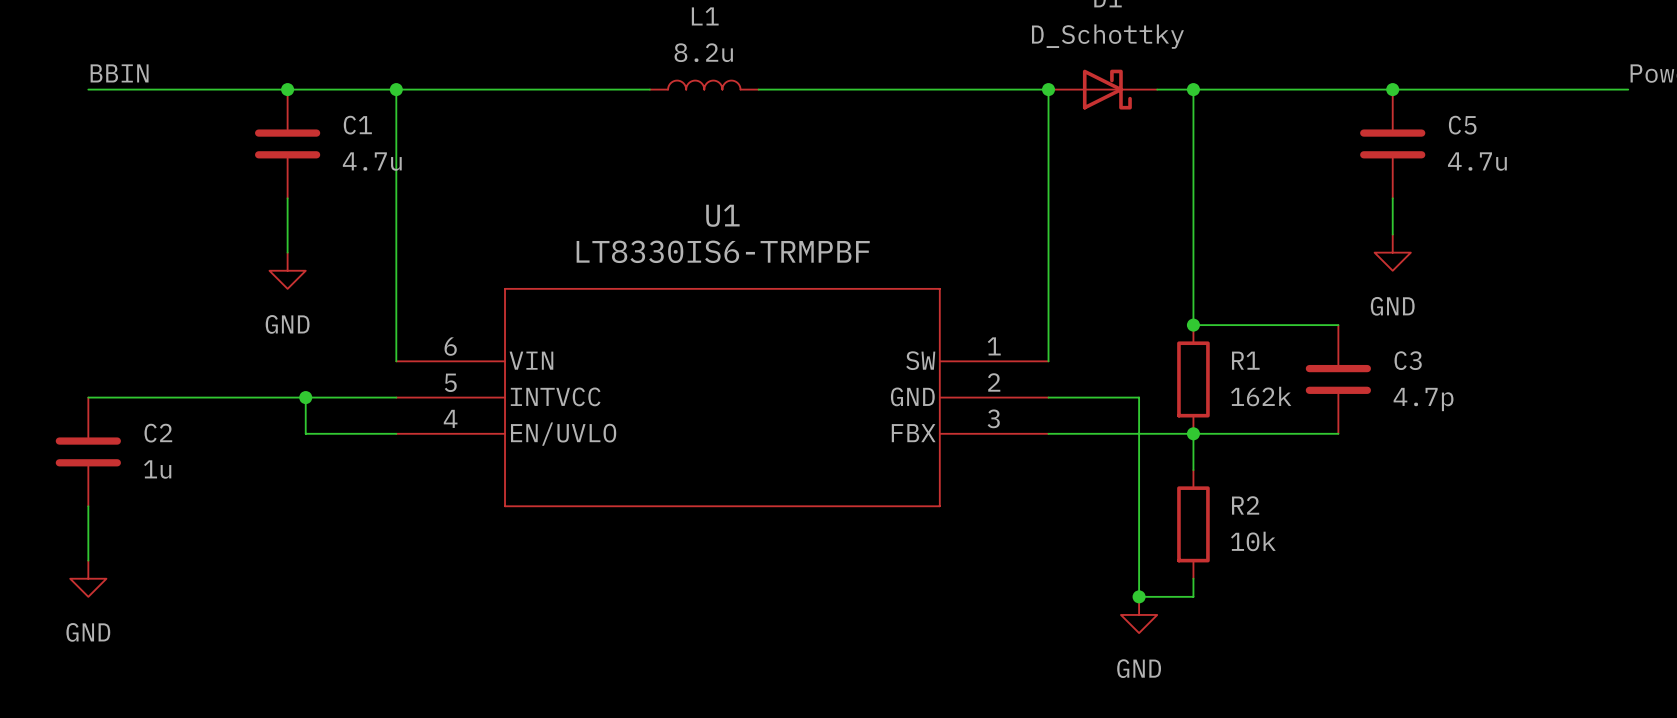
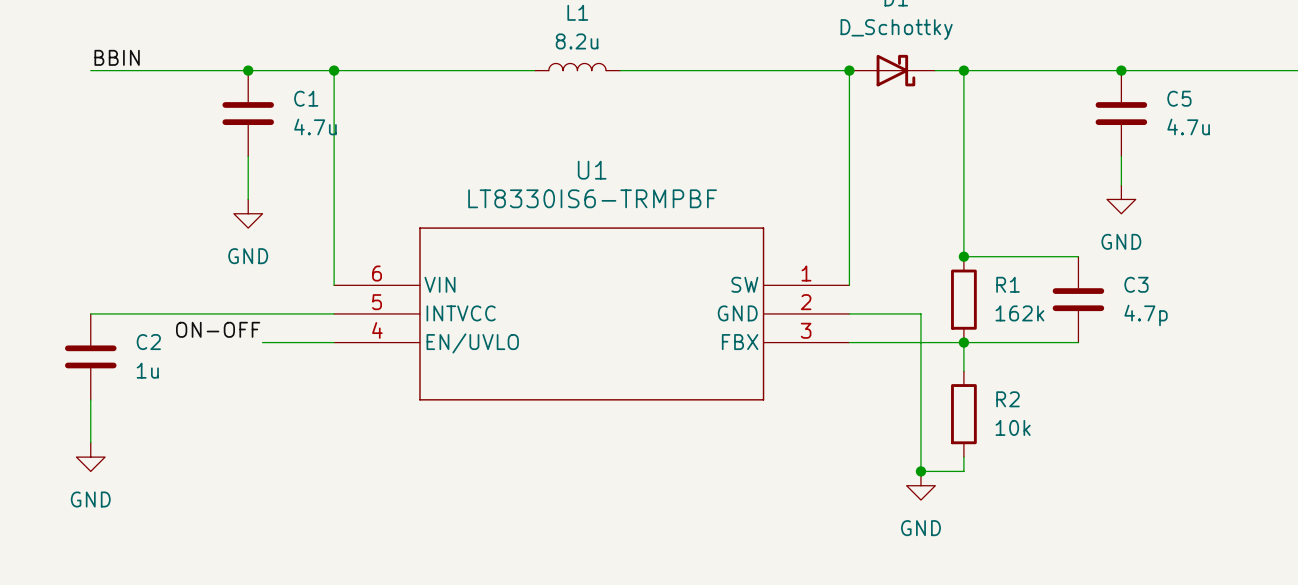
wire: (305, 397) (305, 433) -> none
junction: (305, 397) -> none
label: none -> ON-OFF (218, 329)

